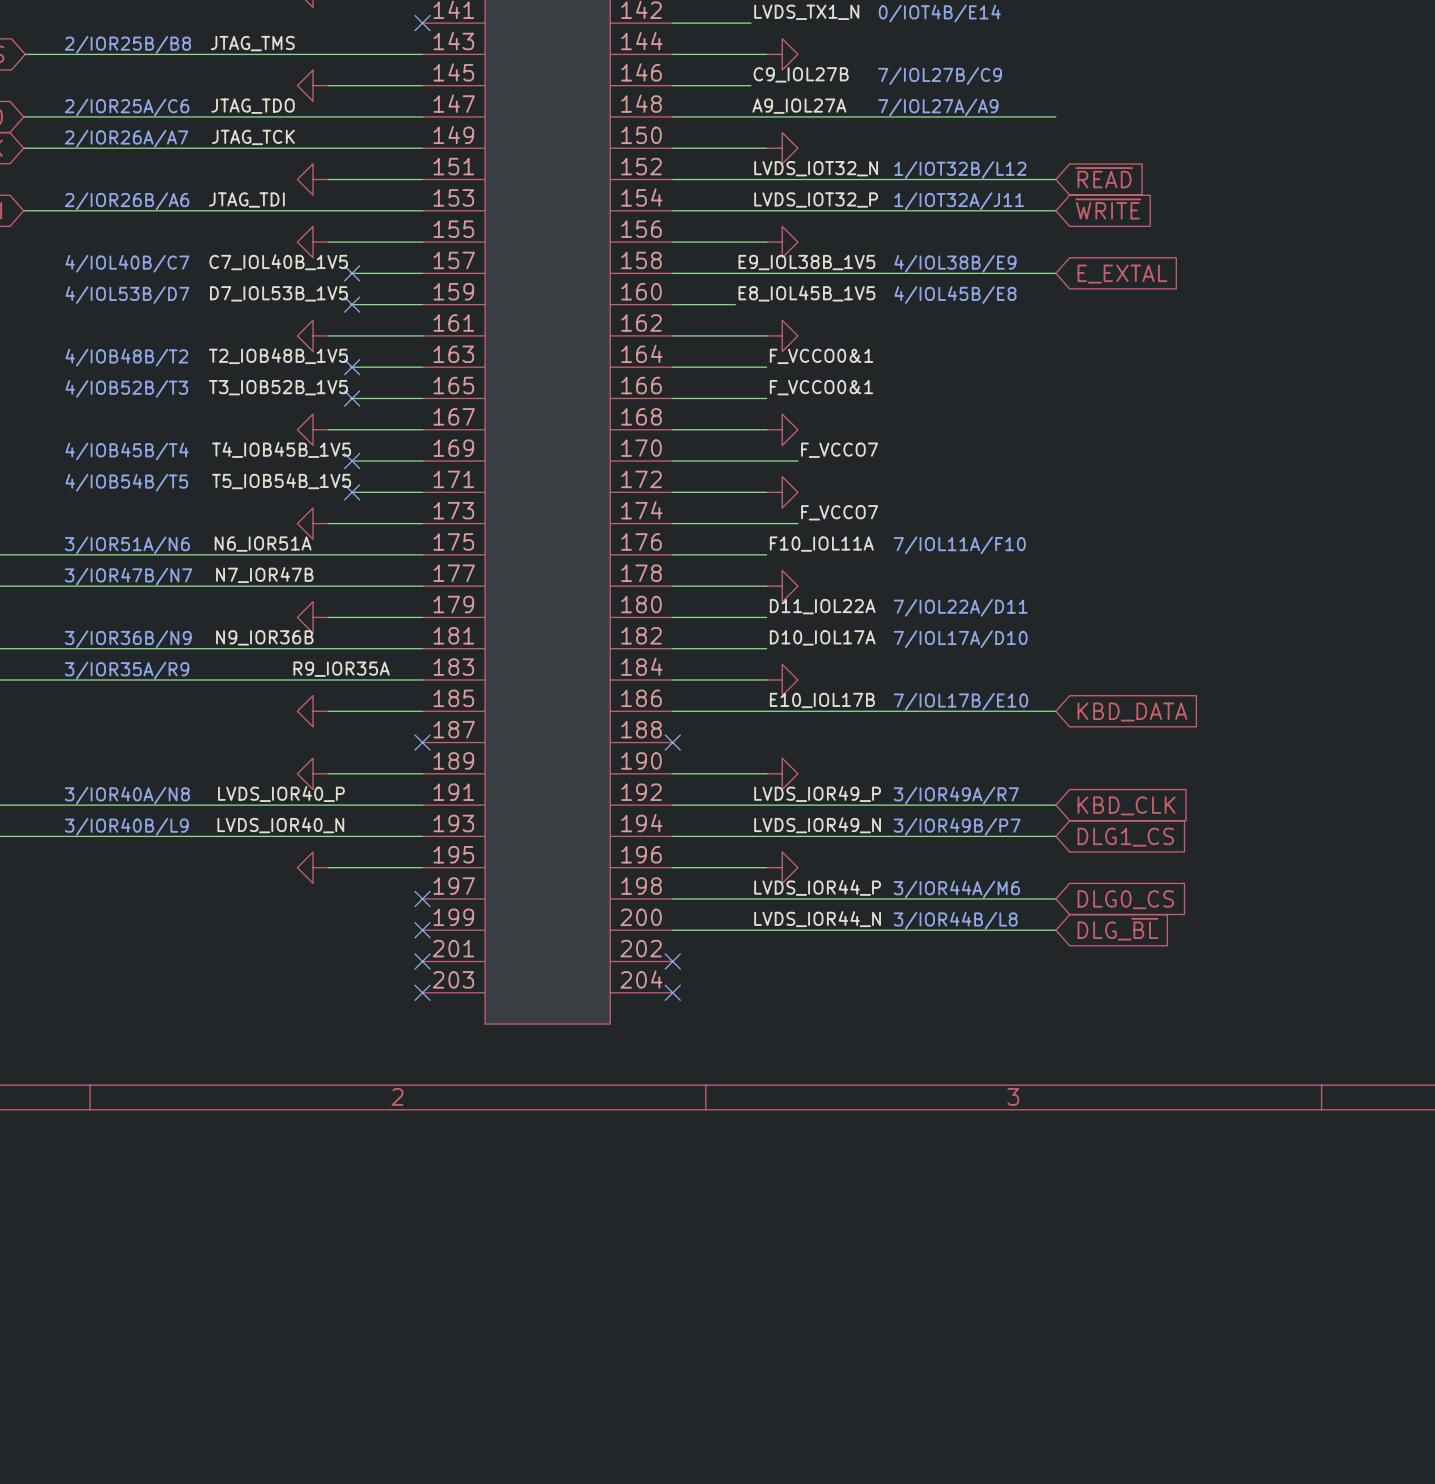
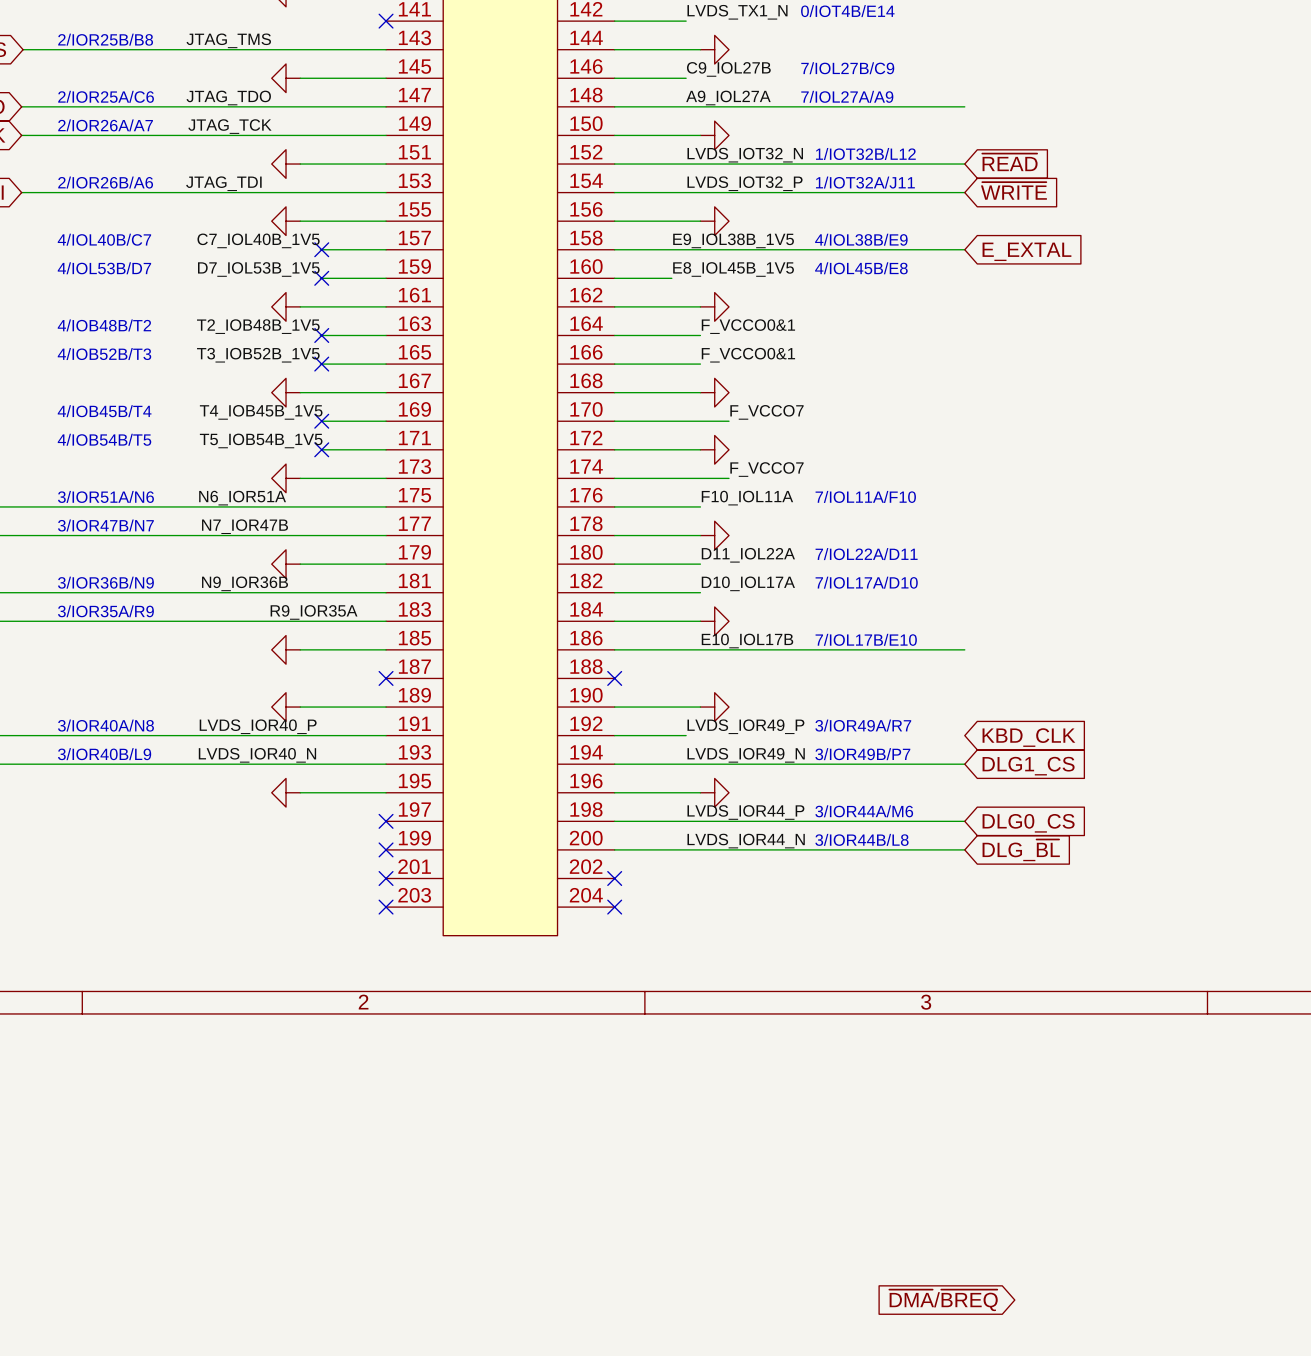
global label: KBD_DATA (1132, 712) -> none
wire: (750, 805) (1055, 805) -> none
global label: none -> ~{DMA}/~{BREQ} (943, 1300)

